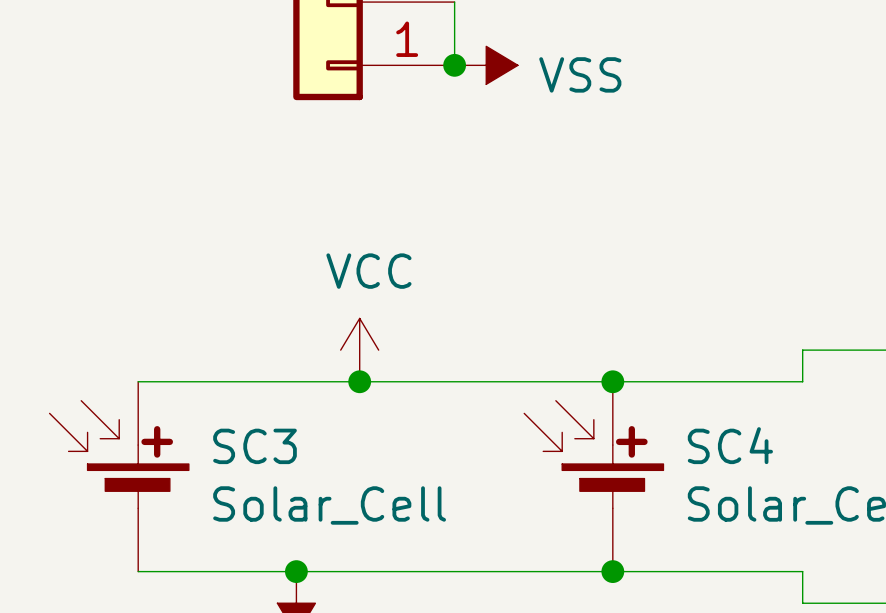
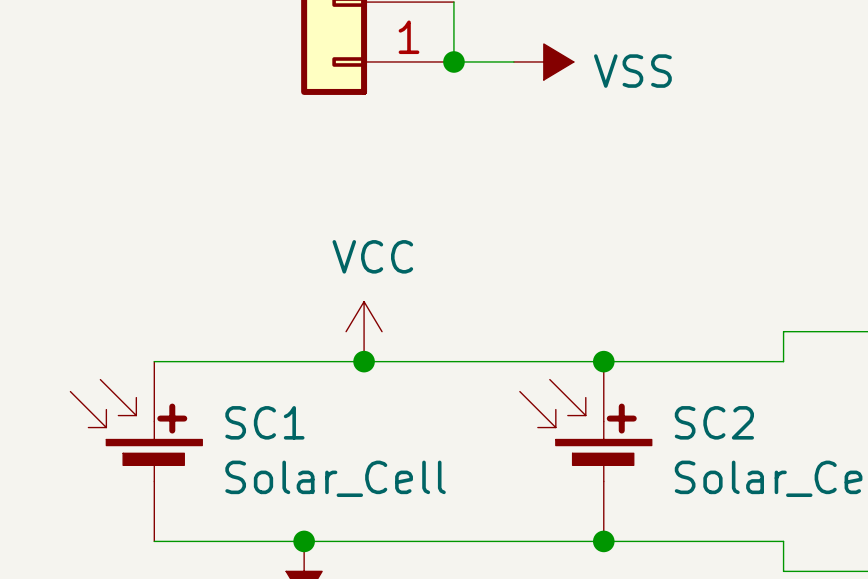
power symbol position: VSS (486, 65) -> VSS (543, 61)
SC4 name: SC4 (730, 445) -> SC2 (714, 422)
SC3 name: SC3 (255, 446) -> SC1 (264, 422)

